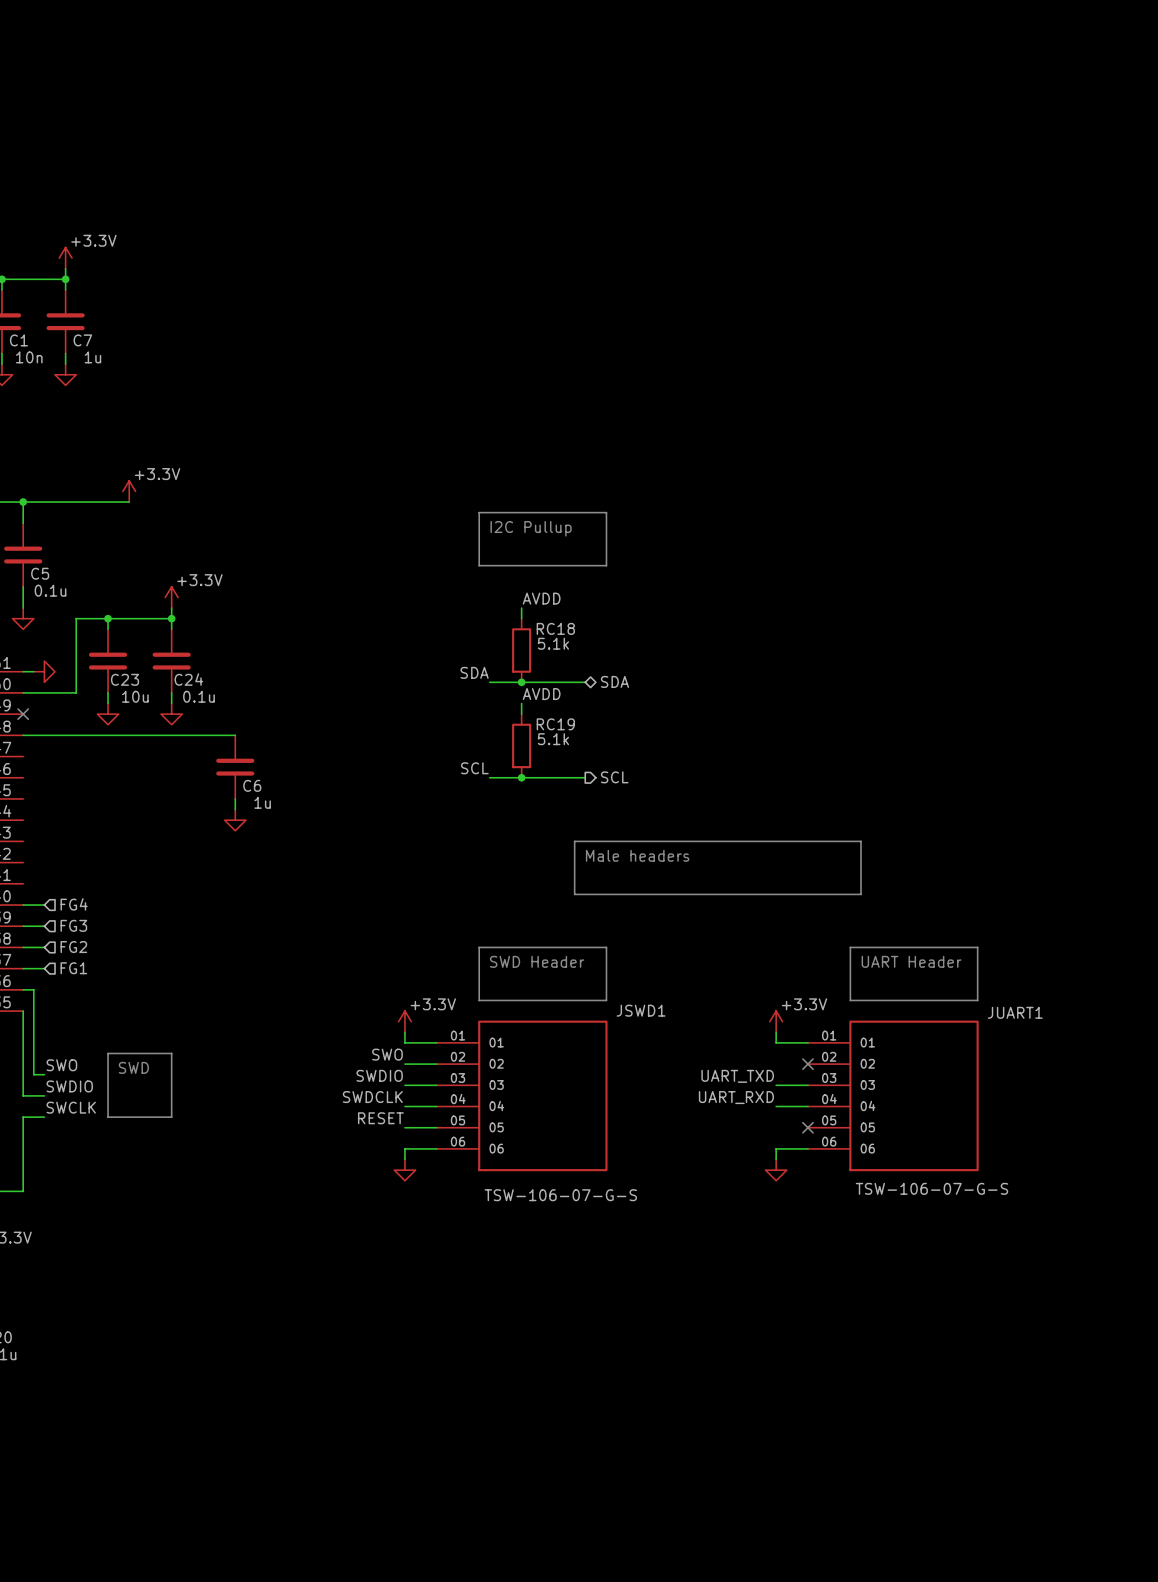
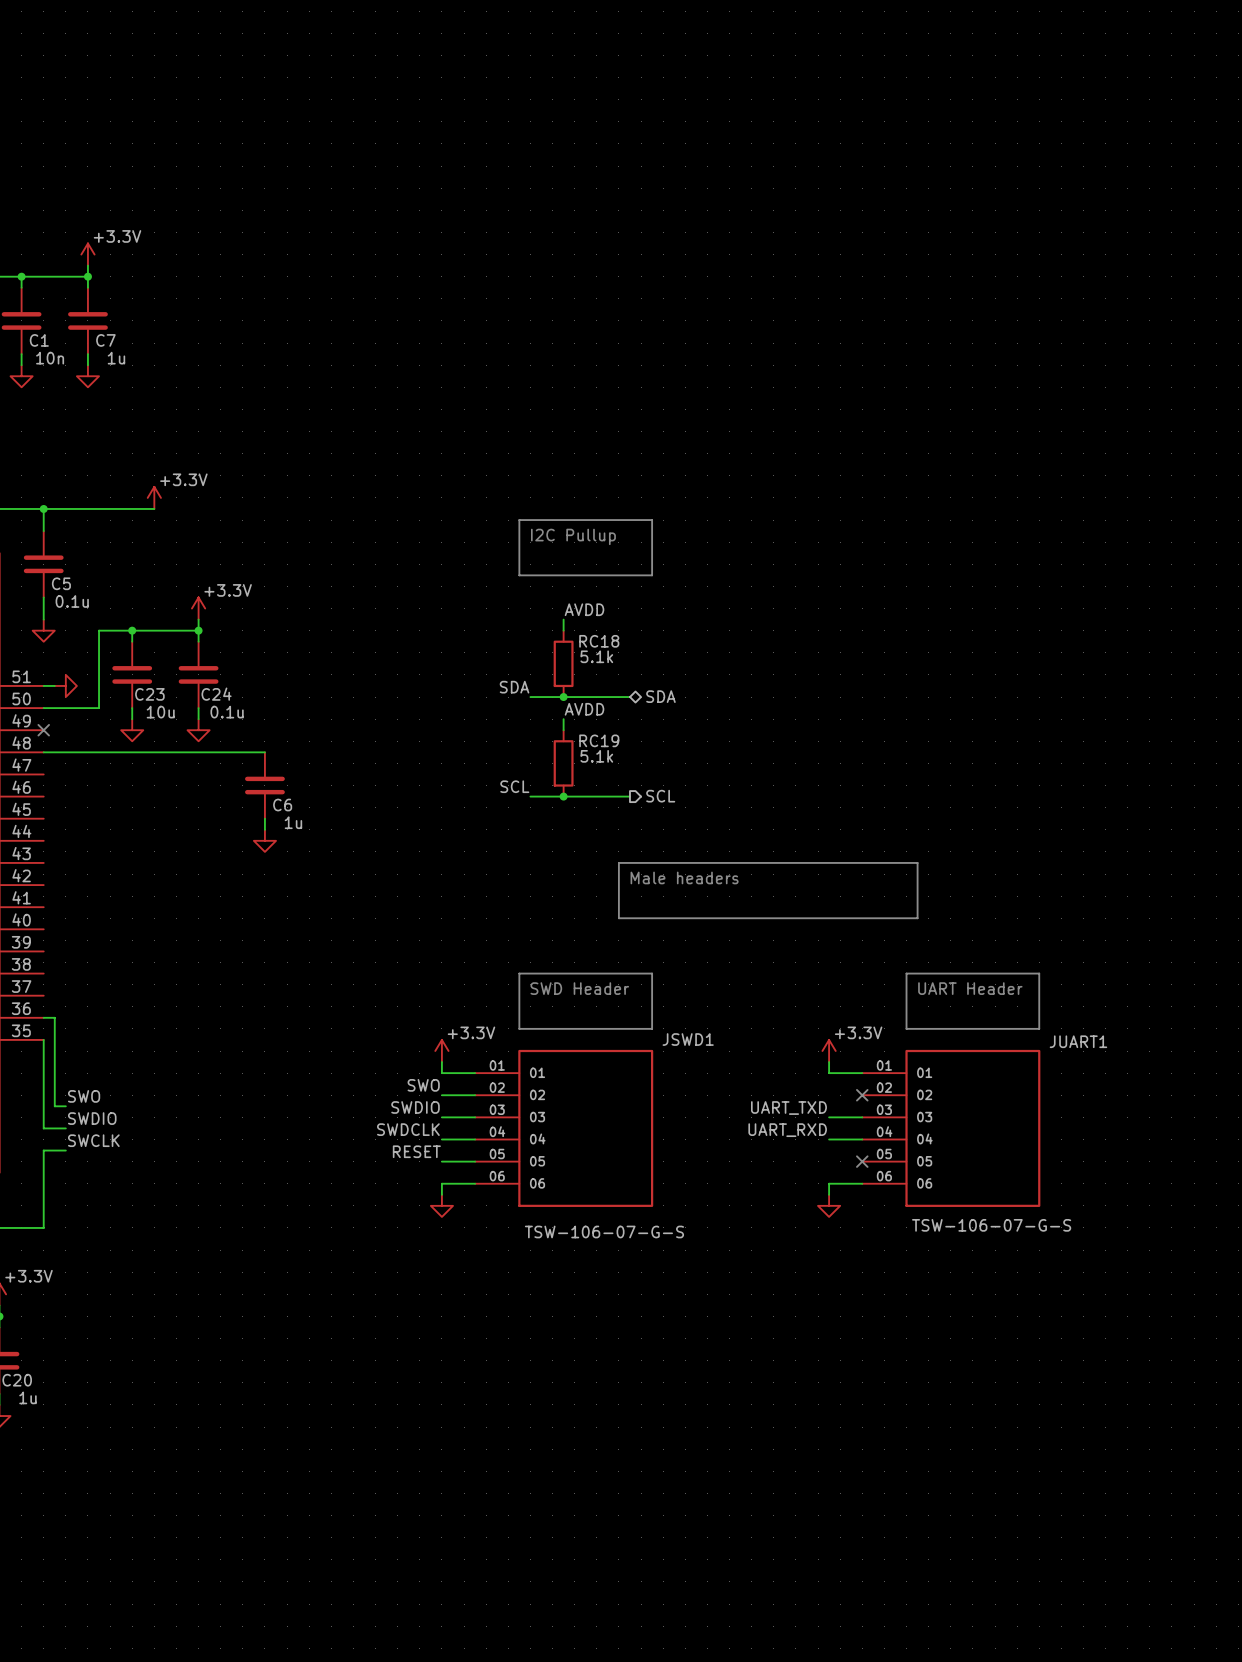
hierarchical label: FG4 (74, 904) -> none
wire: (23, 905) (44, 905) -> none
hierarchical label: FG3 (73, 925) -> none
wire: (23, 926) (44, 926) -> none
wire: (23, 947) (44, 947) -> none
hierarchical label: FG2 (73, 947) -> none
wire: (23, 968) (44, 968) -> none
hierarchical label: FG1 (73, 968) -> none
line: (108, 1053) (171, 1053) (171, 1117) (108, 1117) (108, 1053) -> none
text: SWD (133, 1067) -> none

